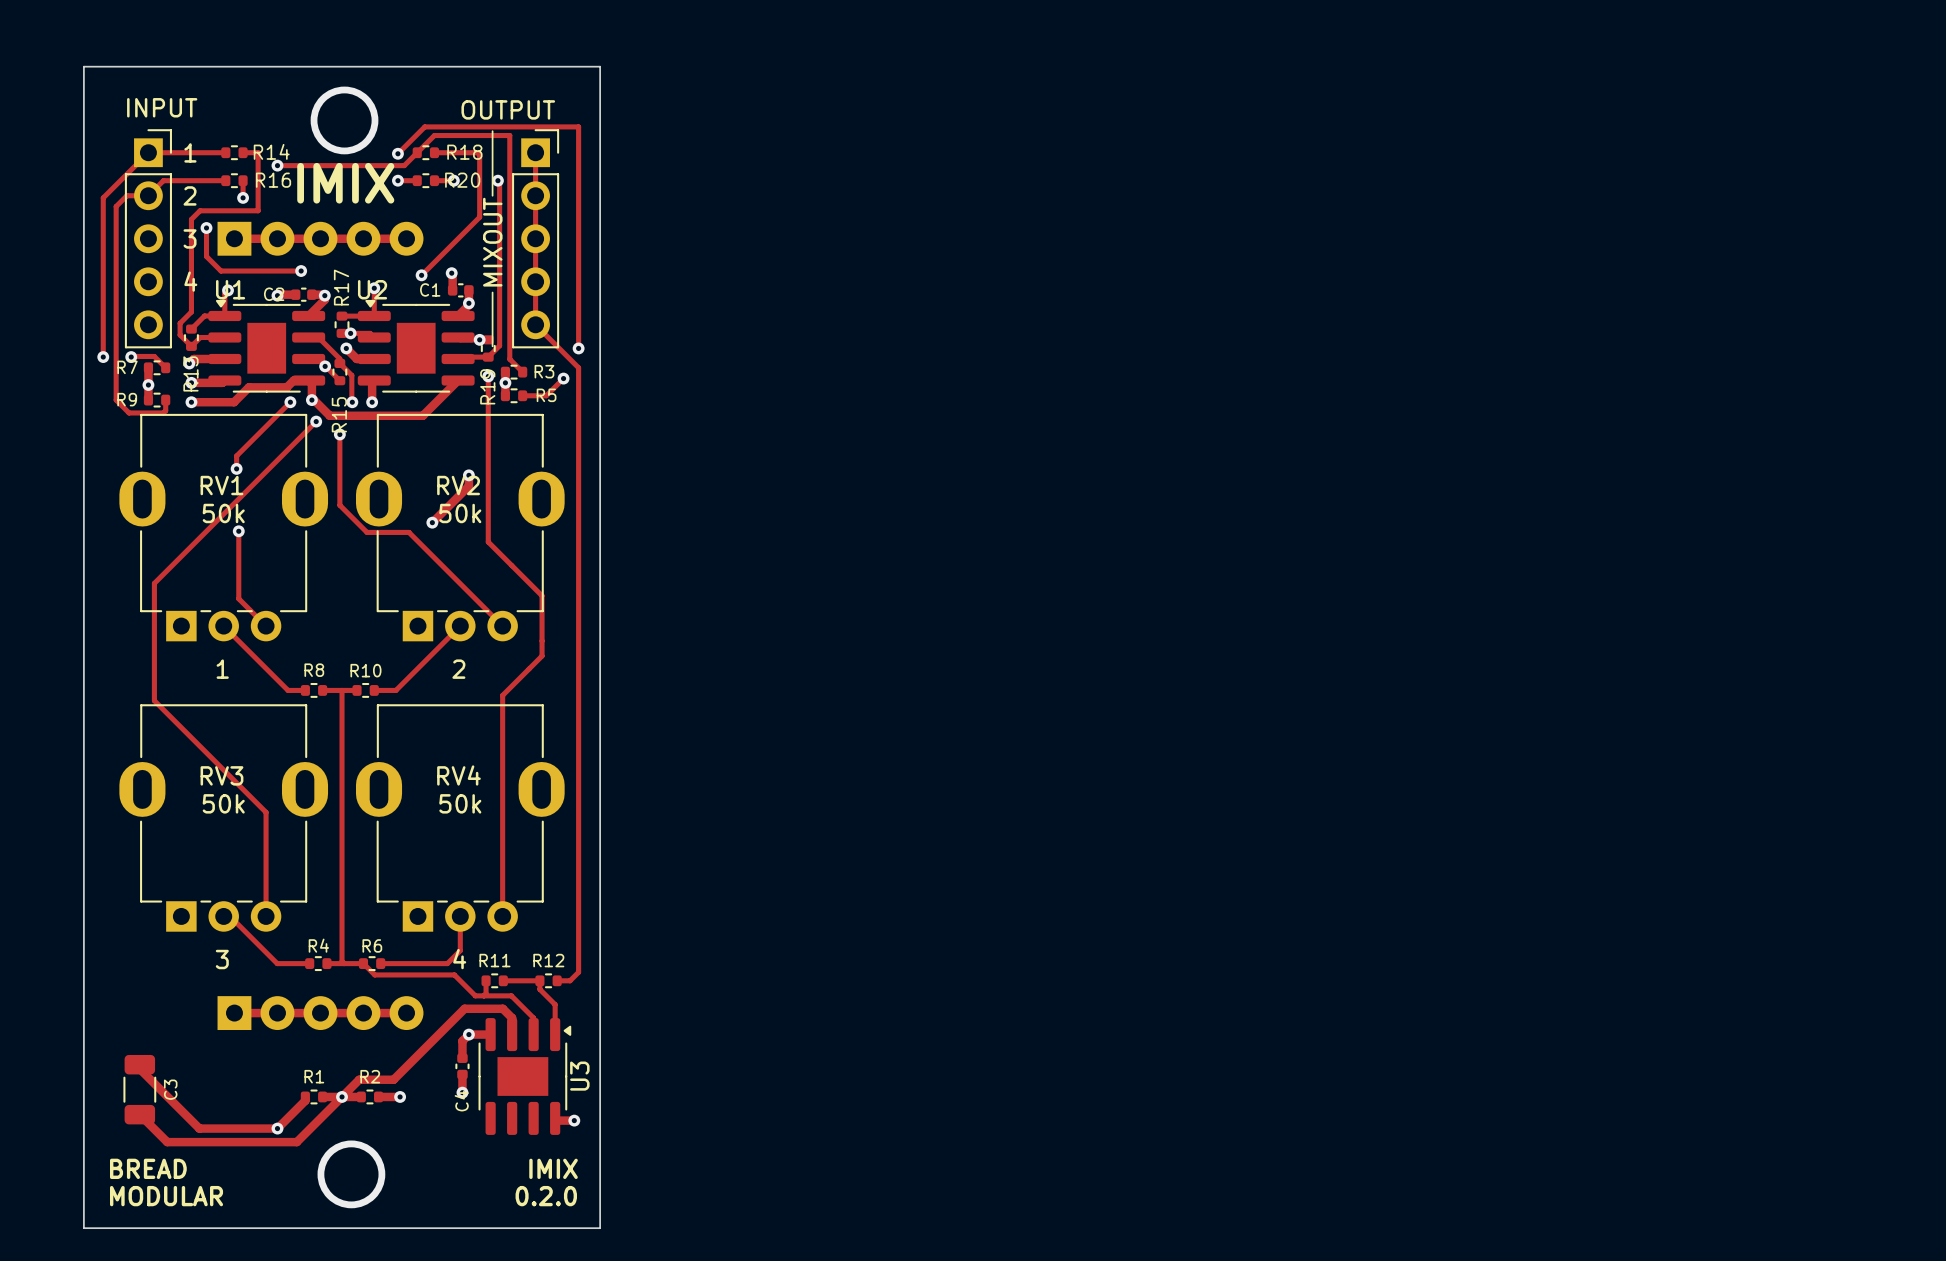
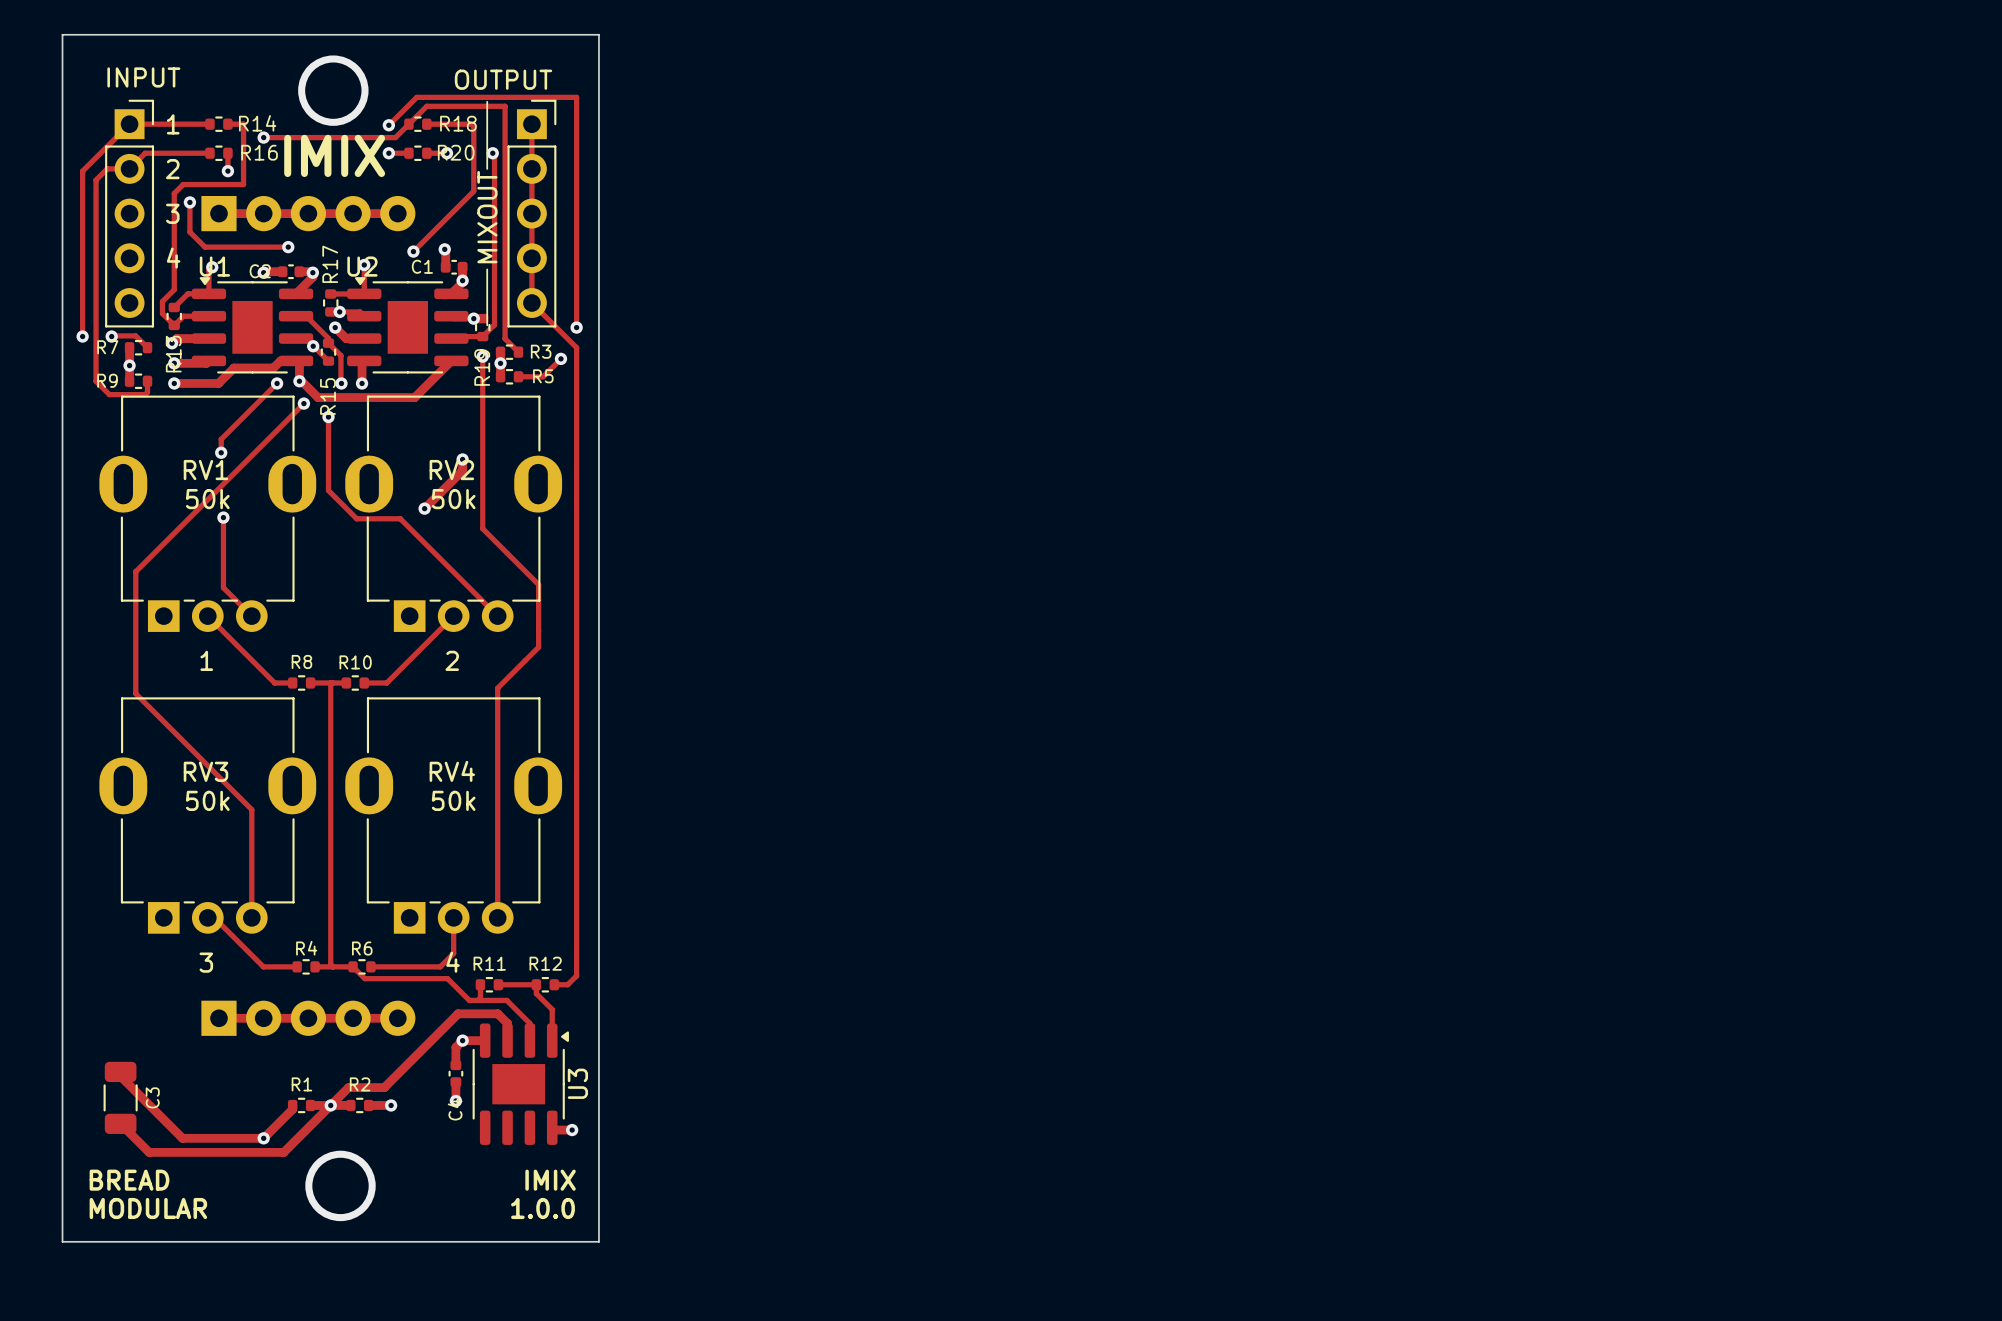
text: 0.2.0 (546, 1196) -> 1.0.0 (543, 1208)

